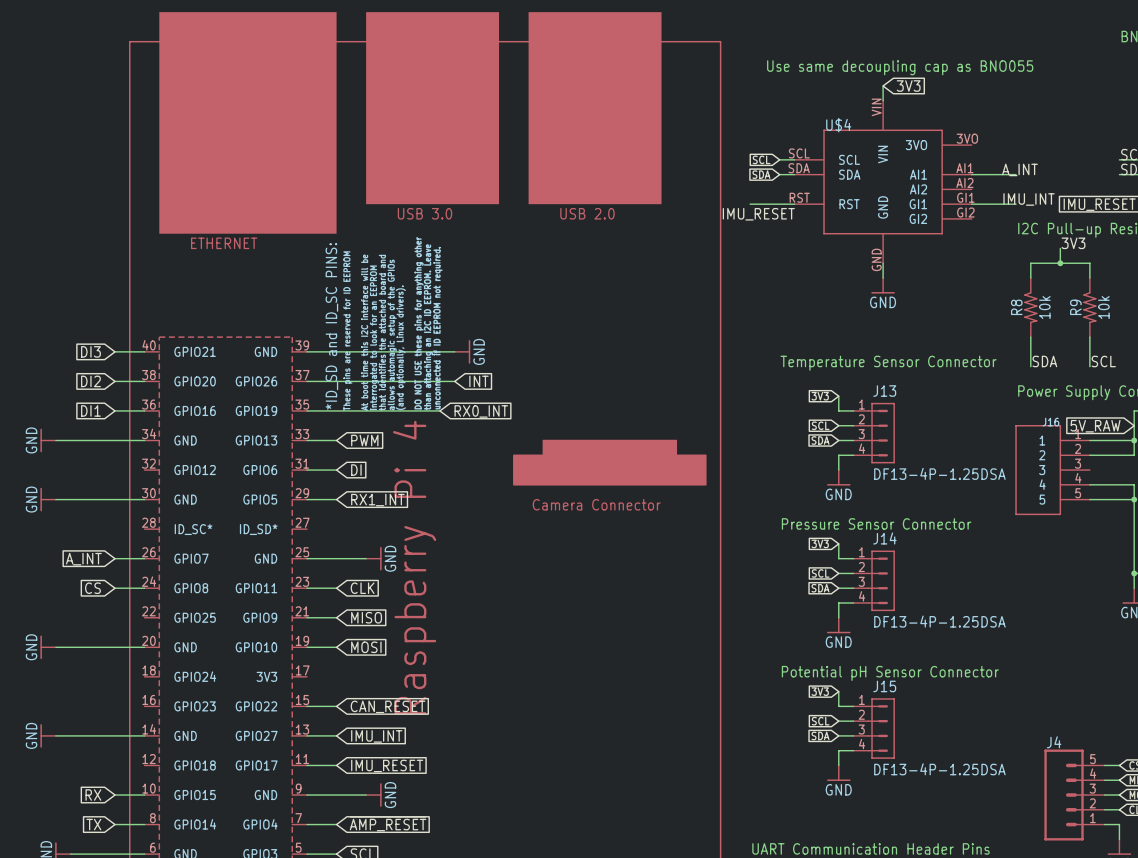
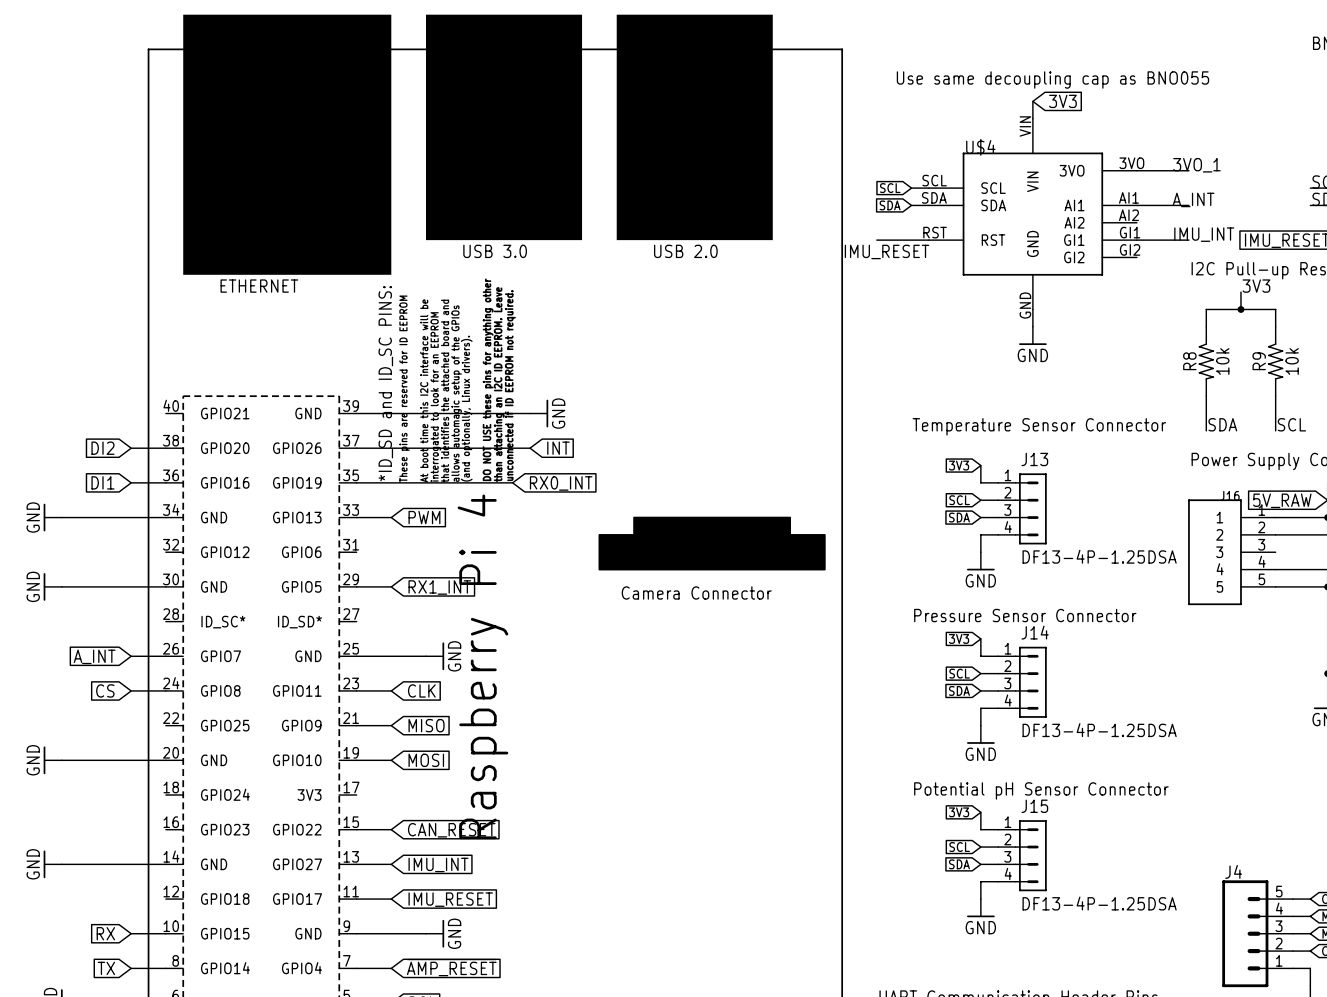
label: none -> 3VO_1 (1196, 165)
wire: none -> (1136, 170) (1188, 170)
global label: DI3 (90, 351) -> none
wire: (114, 351) (144, 351) -> none
wire: (307, 470) (336, 470) -> none
global label: DI (356, 470) -> none

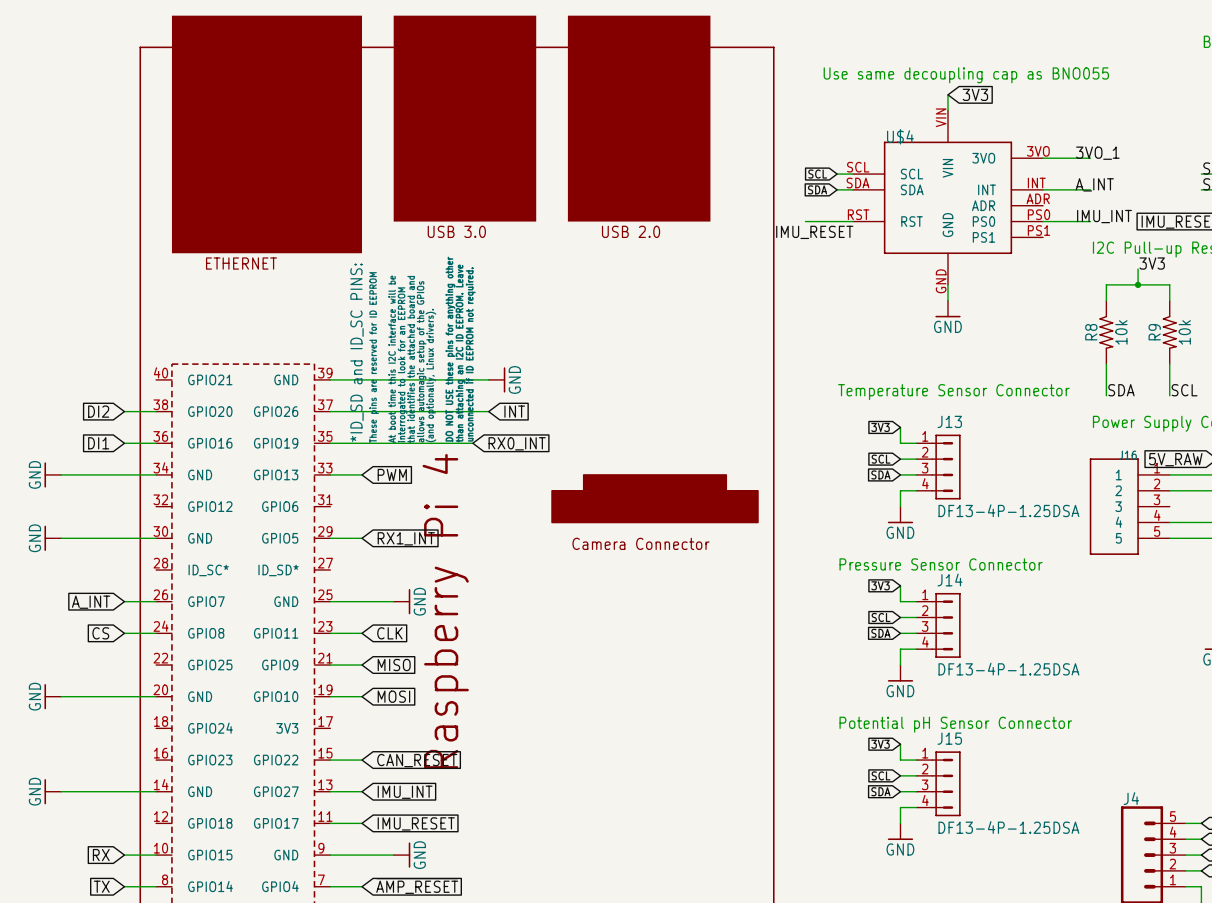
U$4 pin number: AI1 (1128, 197) -> INT (1036, 183)
U$4 pin name: AI1 (1074, 205) -> INT (987, 189)
U$4 pin number: AI2 (1128, 215) -> ADR (1038, 198)
U$4 pin name: AI2 (1074, 222) -> ADR (983, 205)
U$4 pin number: GI1 (1130, 232) -> PS0 (1039, 214)
U$4 pin name: GI1 (1074, 240) -> PS0 (983, 221)
U$4 pin number: GI2 (1130, 249) -> PS1 (1039, 230)
U$4 pin name: GI2 (1074, 257) -> PS1 (983, 237)

